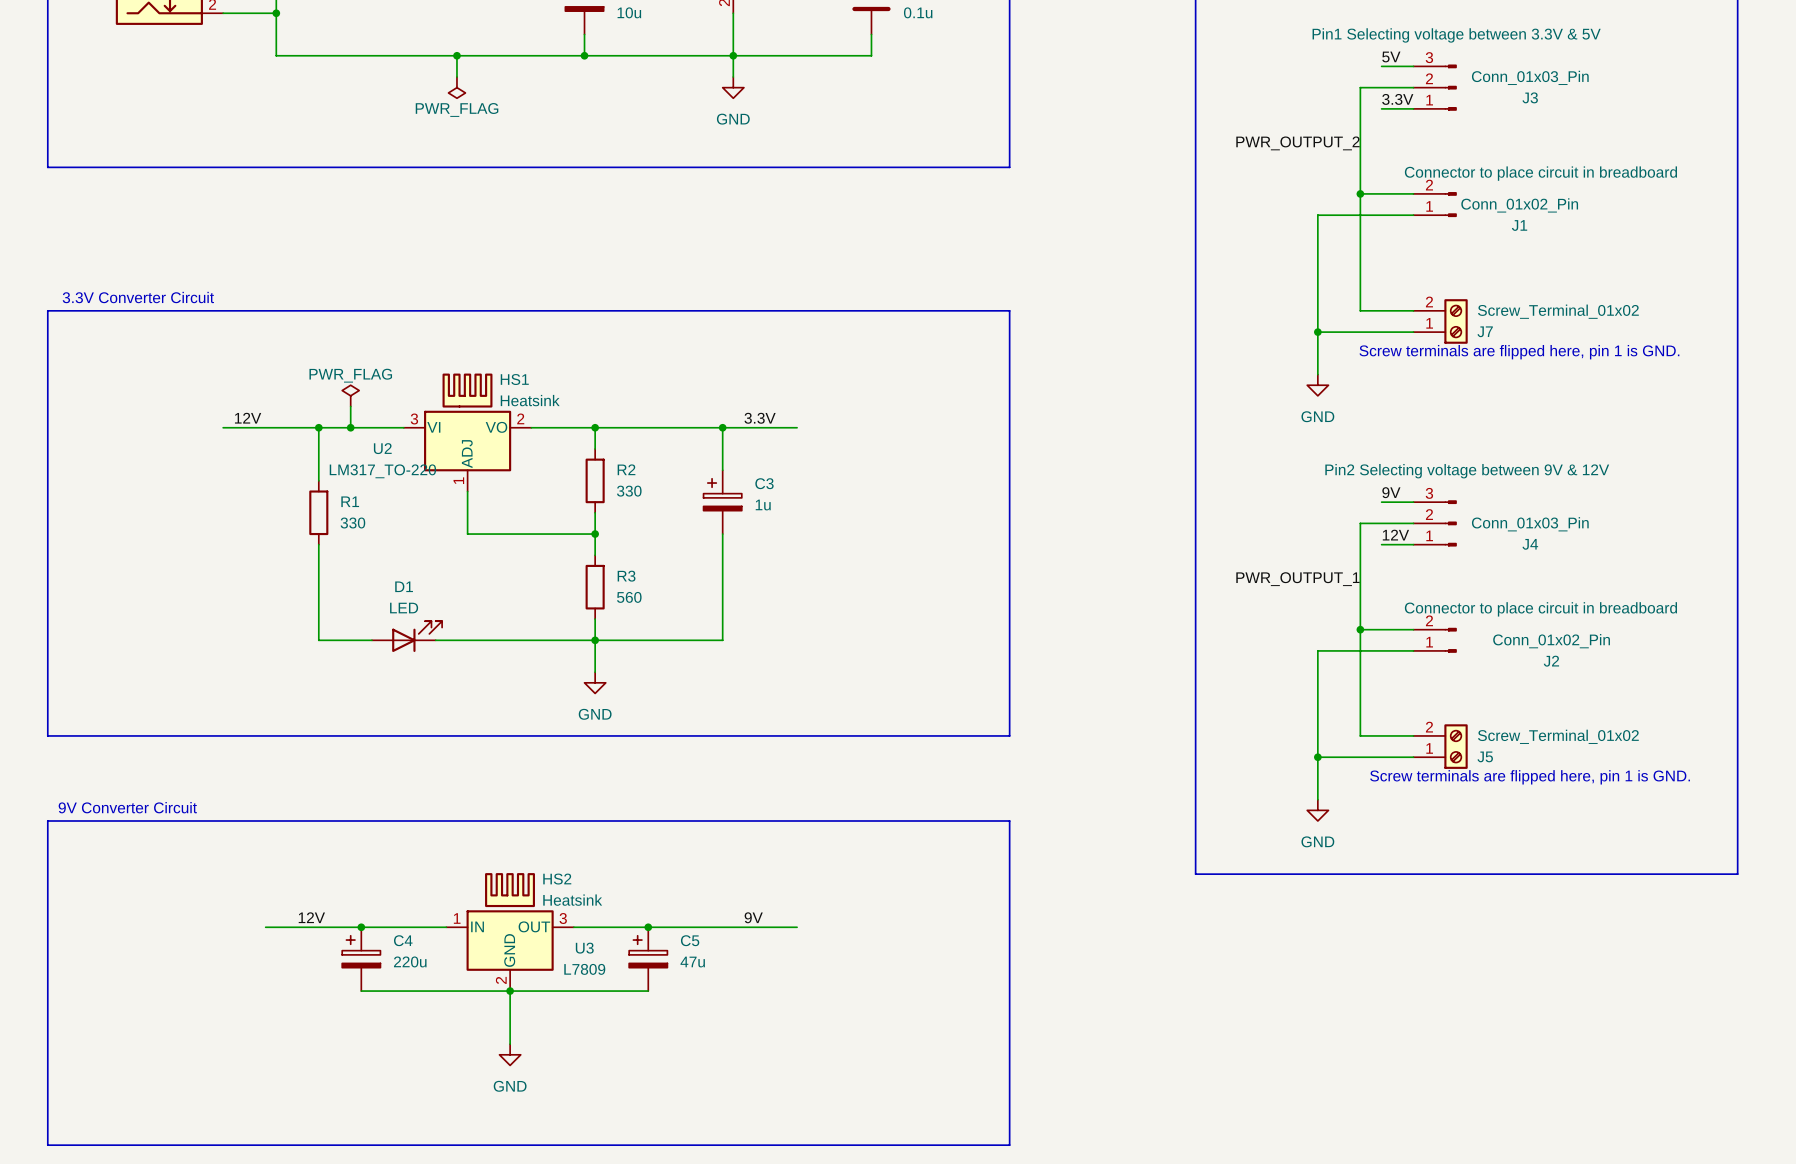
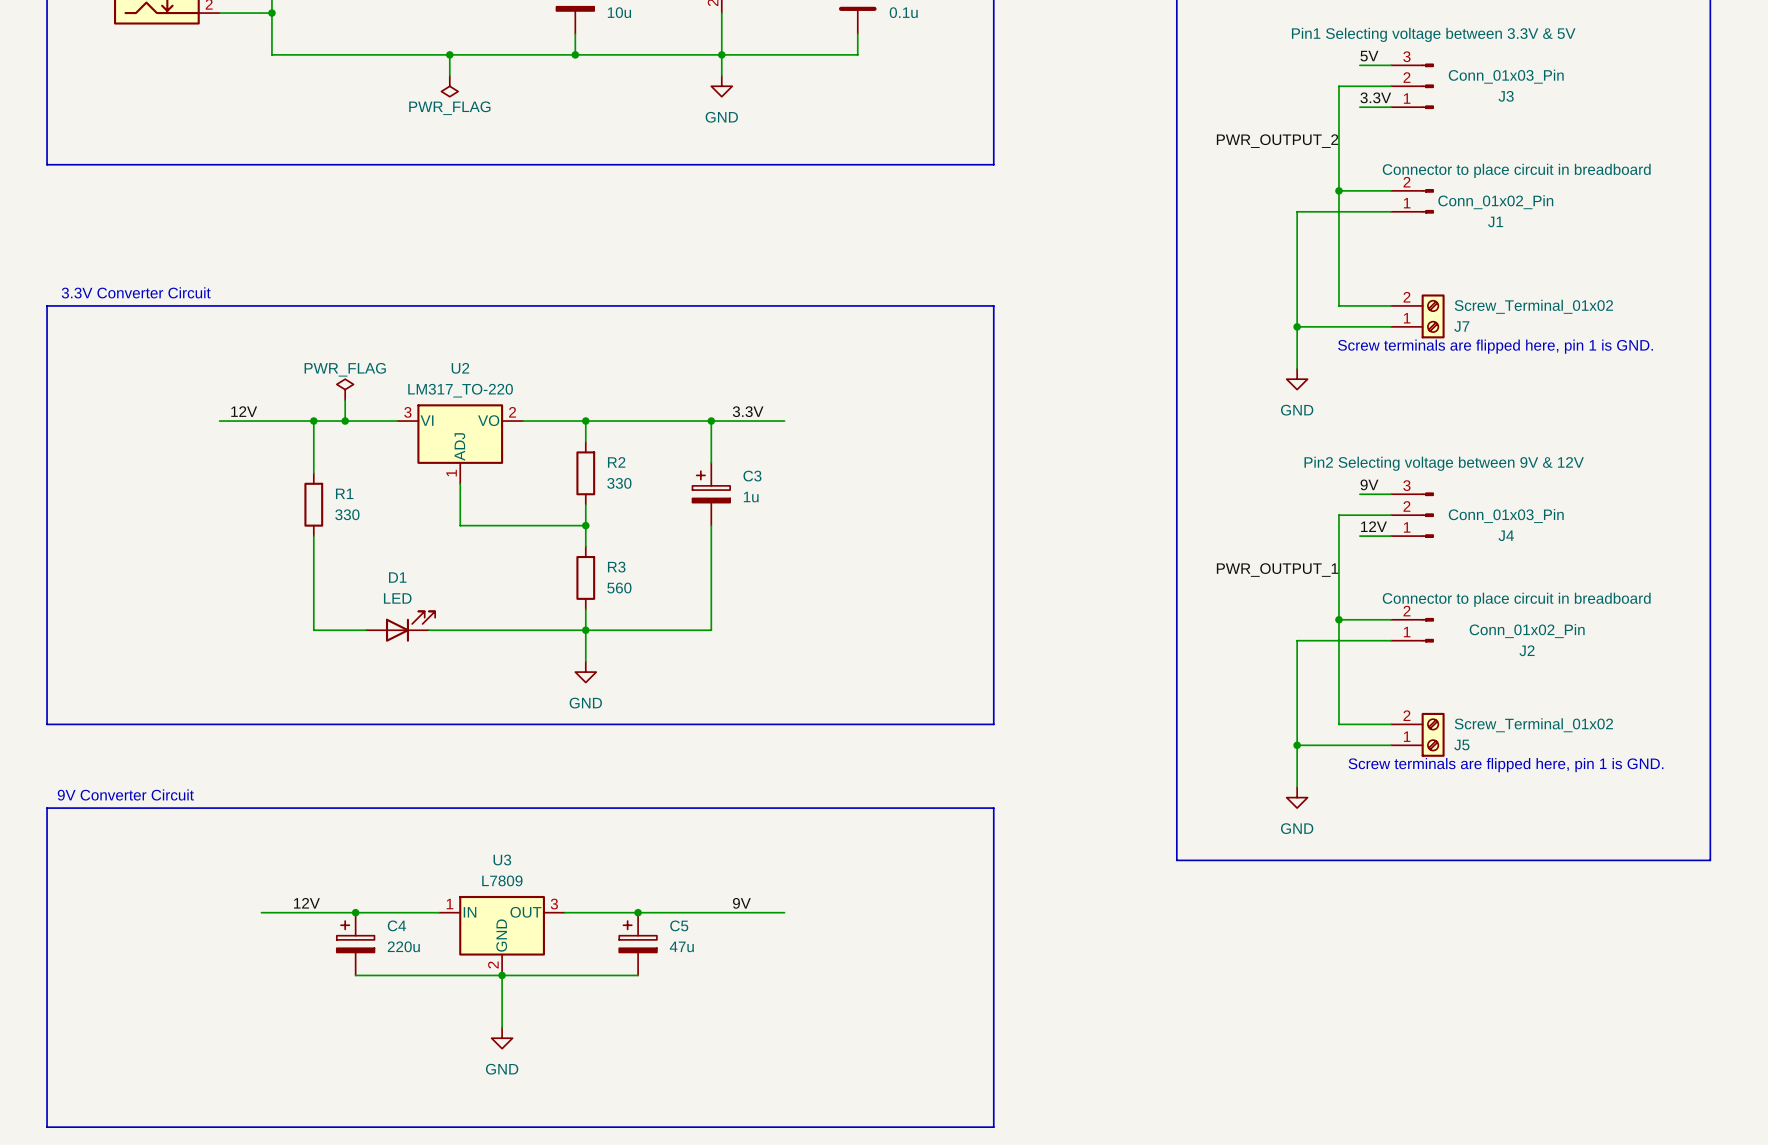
HS1: Heatsink (467, 390) -> none
U2 name position: U2 (382, 448) -> U2 (460, 368)
U2 value position: LM317_TO-220 (382, 471) -> LM317_TO-220 (460, 390)
HS2: Heatsink (510, 890) -> none
U3 name position: U3 (584, 948) -> U3 (502, 859)
U3 value position: L7809 (584, 969) -> L7809 (502, 880)

